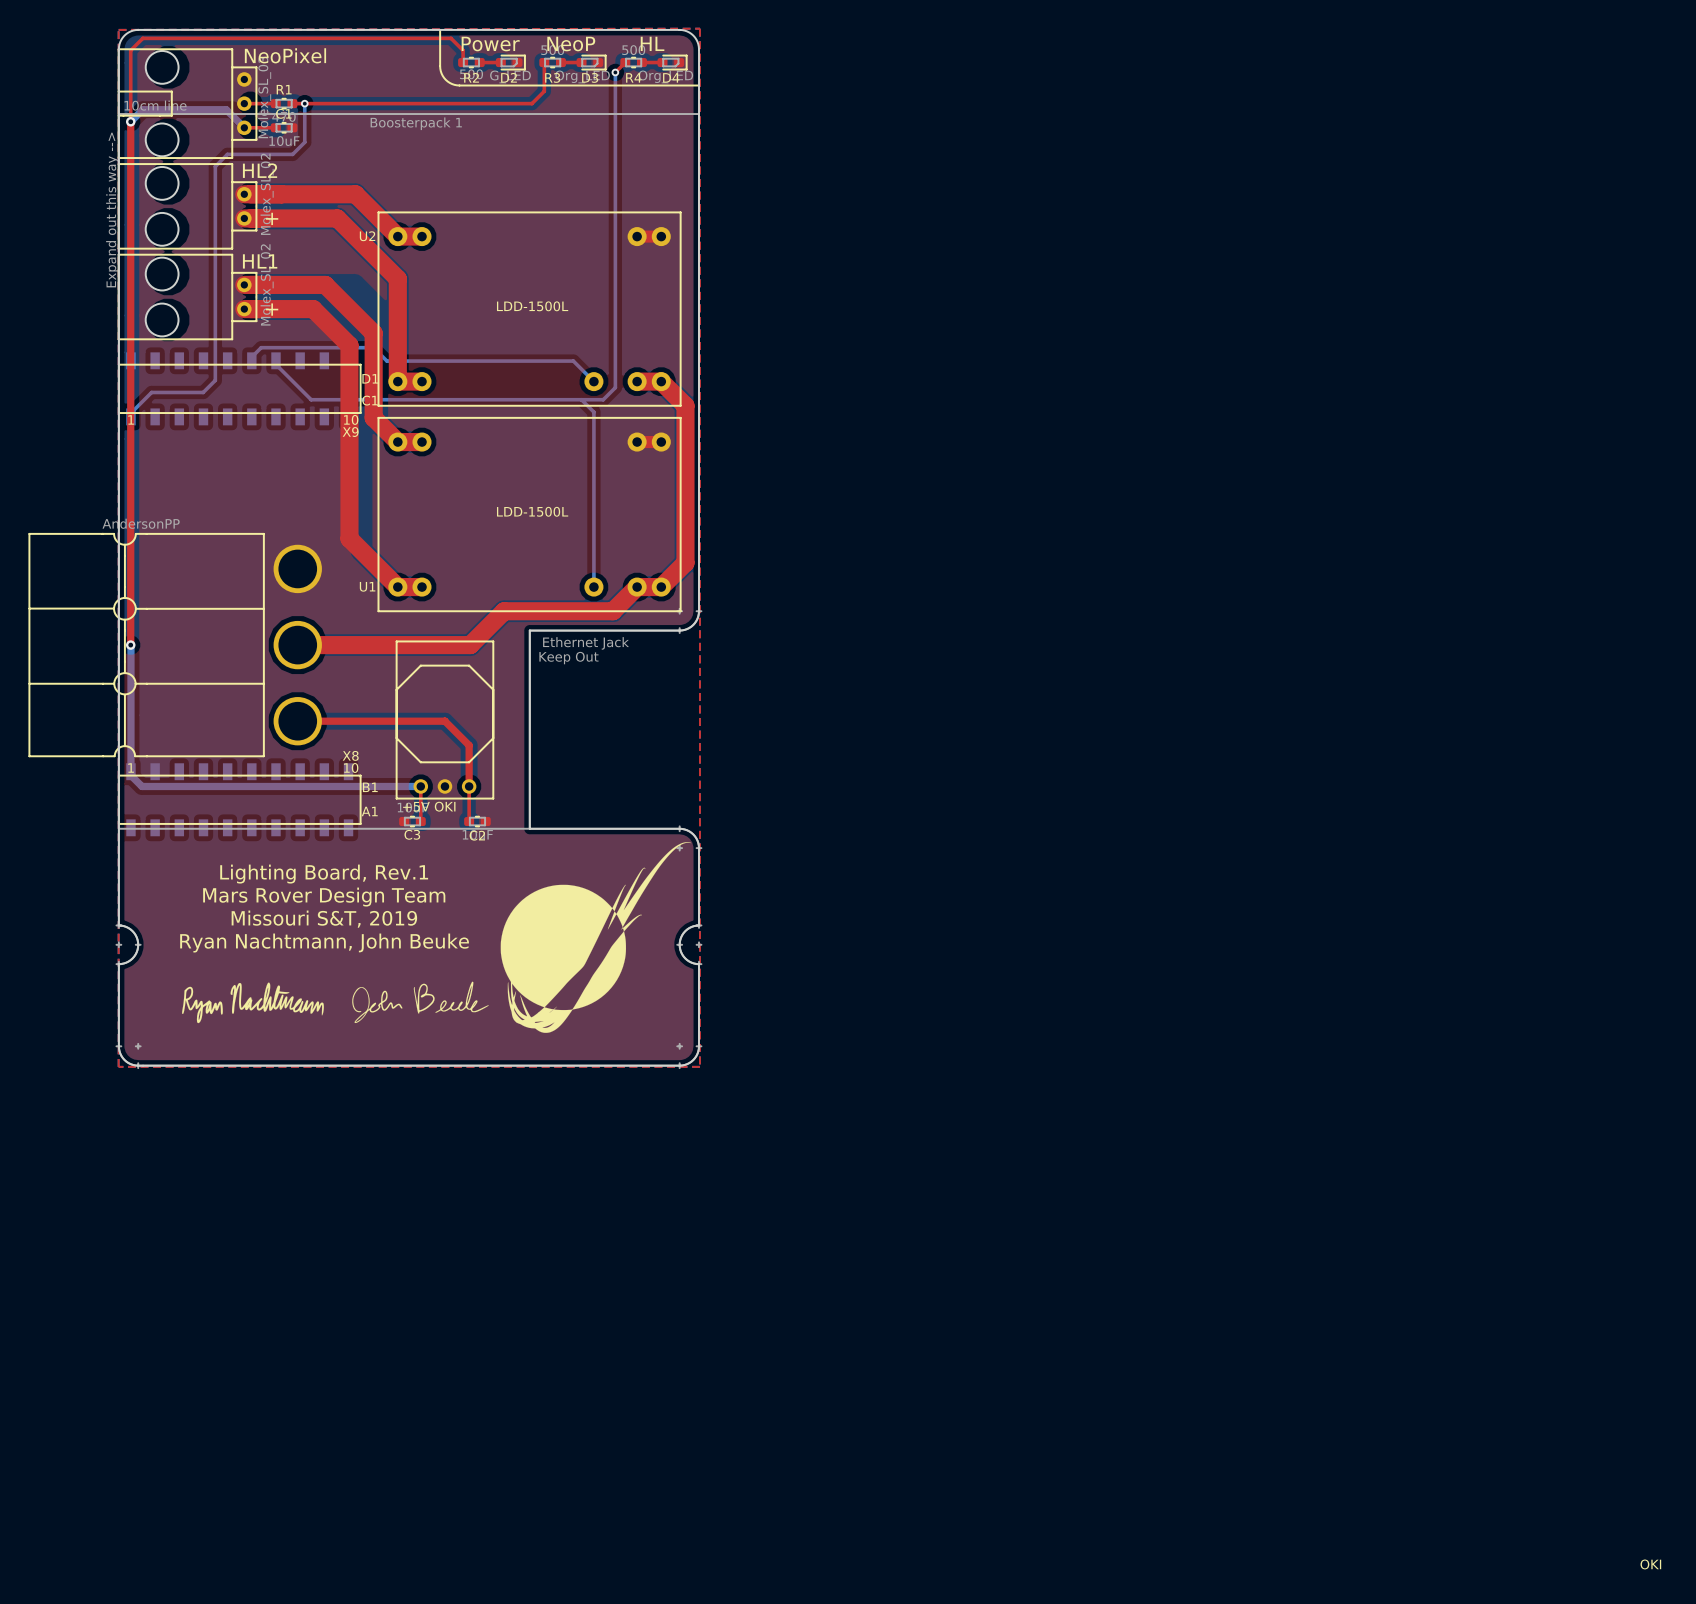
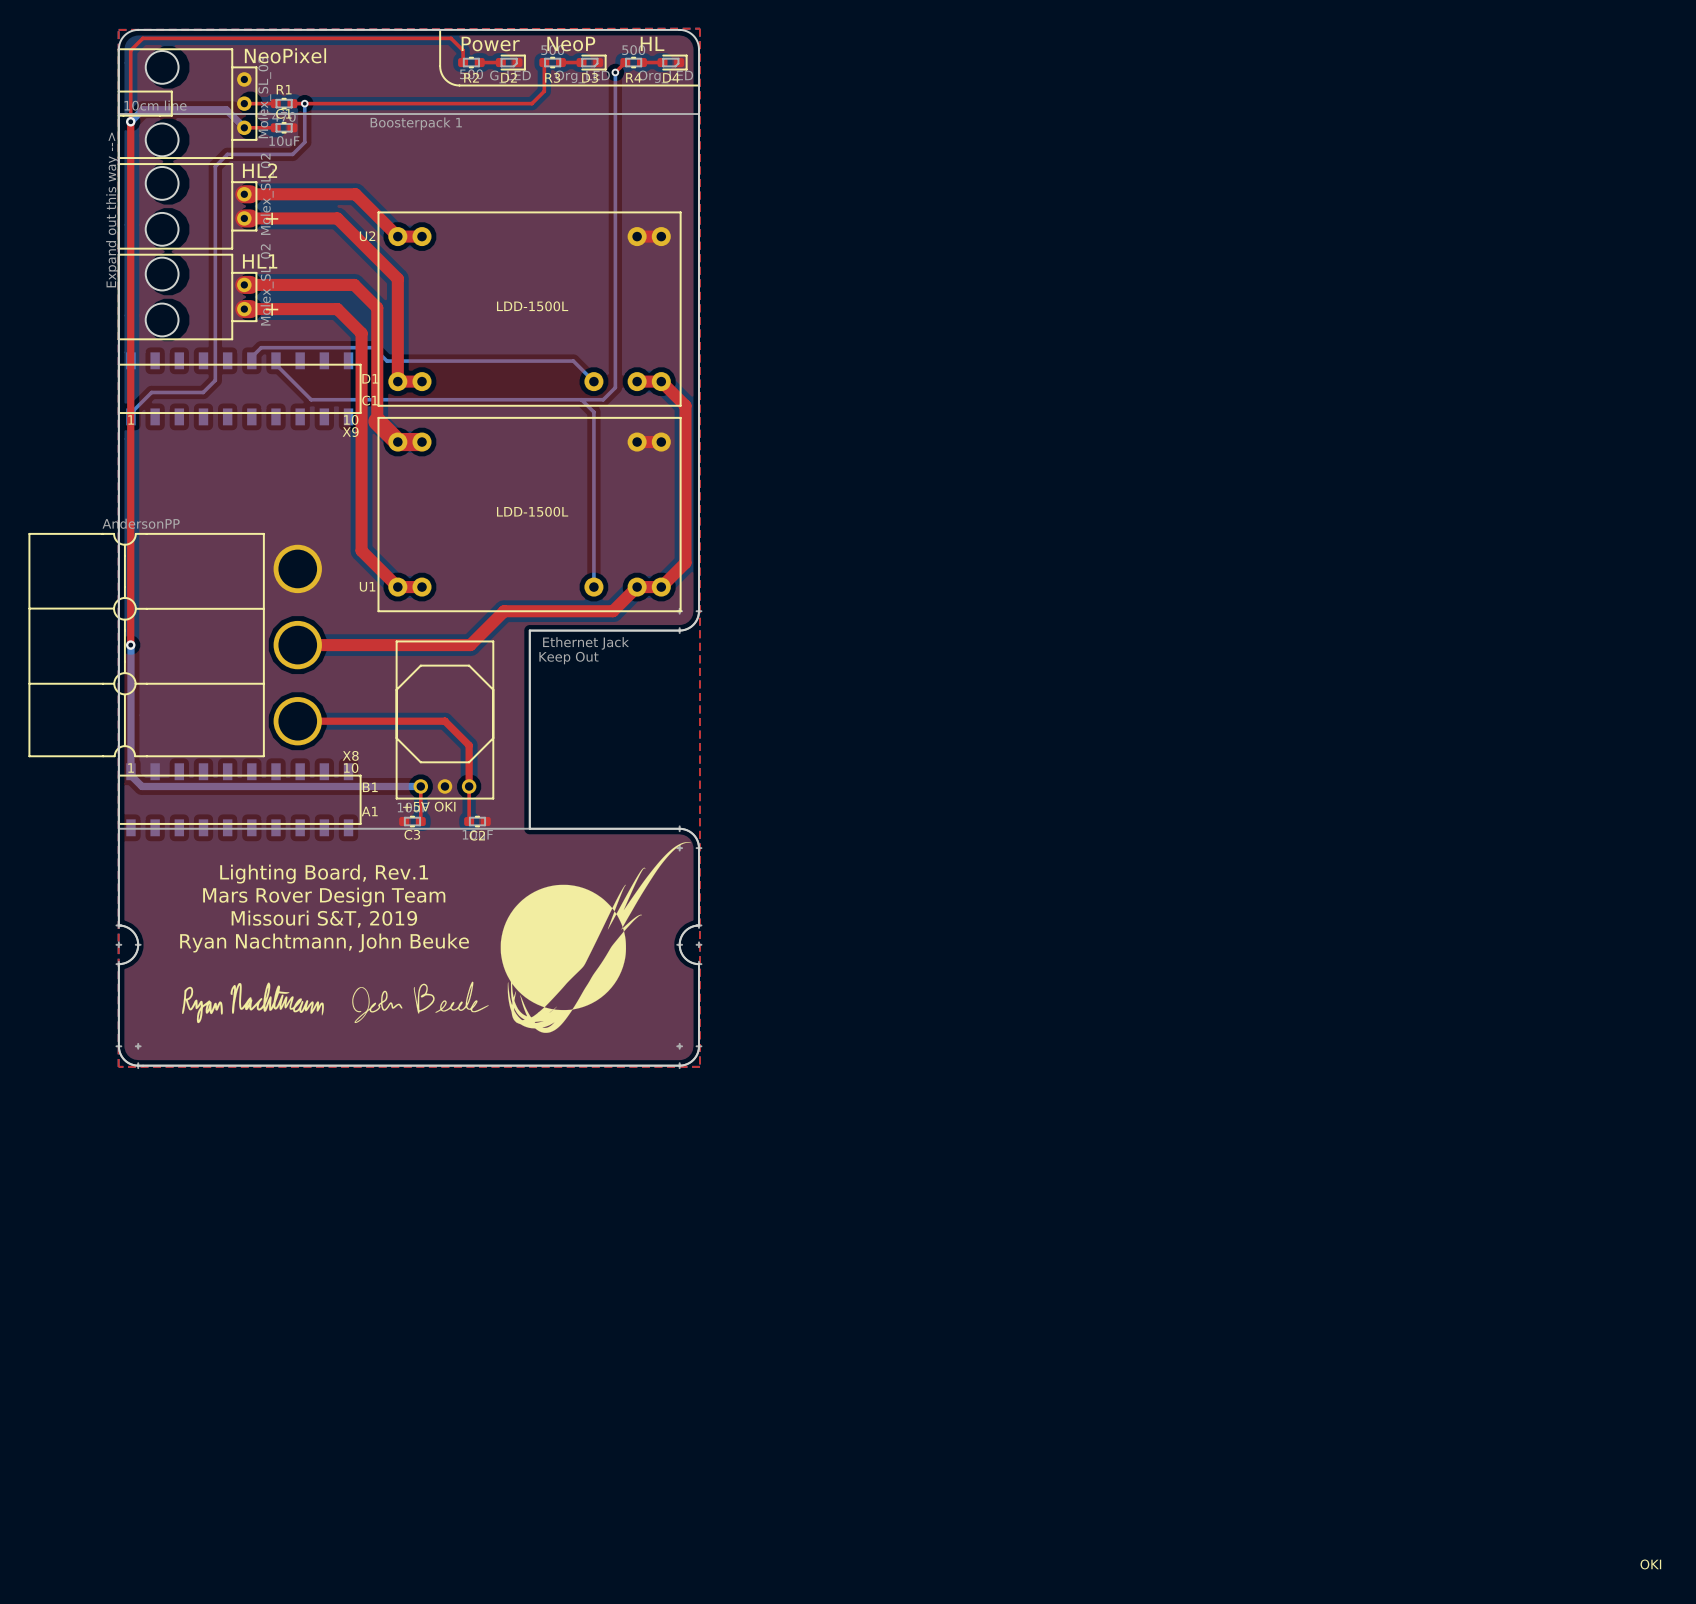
top track width: thick (250, 194) (355, 194) (397, 236) (422, 236) -> thin (250, 194) (355, 194) (397, 236) (422, 236)
top track width: thick (250, 218) (337, 218) (397, 278) (397, 381) (422, 381) -> thin (250, 218) (337, 218) (397, 278) (397, 381) (422, 381)
top track width: thick (250, 284) (325, 284) -> thin (250, 284) (325, 284)
top track: (325, 284) (373, 333) (373, 417) (377, 421) -> (325, 284) (354, 284) (377, 307) (377, 421)
top track width: thick (250, 309) (313, 309) -> thin (250, 309) (313, 309)
top track: (313, 309) (349, 345) (349, 538) (361, 550) -> (313, 309) (337, 309) (361, 333) (361, 550)
top track width: thick (637, 381) (661, 381) (685, 405) (685, 562) (661, 587) (637, 587) (612, 611) (504, 611) (470, 645) (297, 645) -> thin (637, 381) (661, 381) (685, 405) (685, 562) (661, 587) (637, 587) (612, 611) (504, 611) (470, 645) (297, 645)
top track width: thick (361, 550) (397, 587) (422, 587) -> thin (361, 550) (397, 587) (422, 587)

